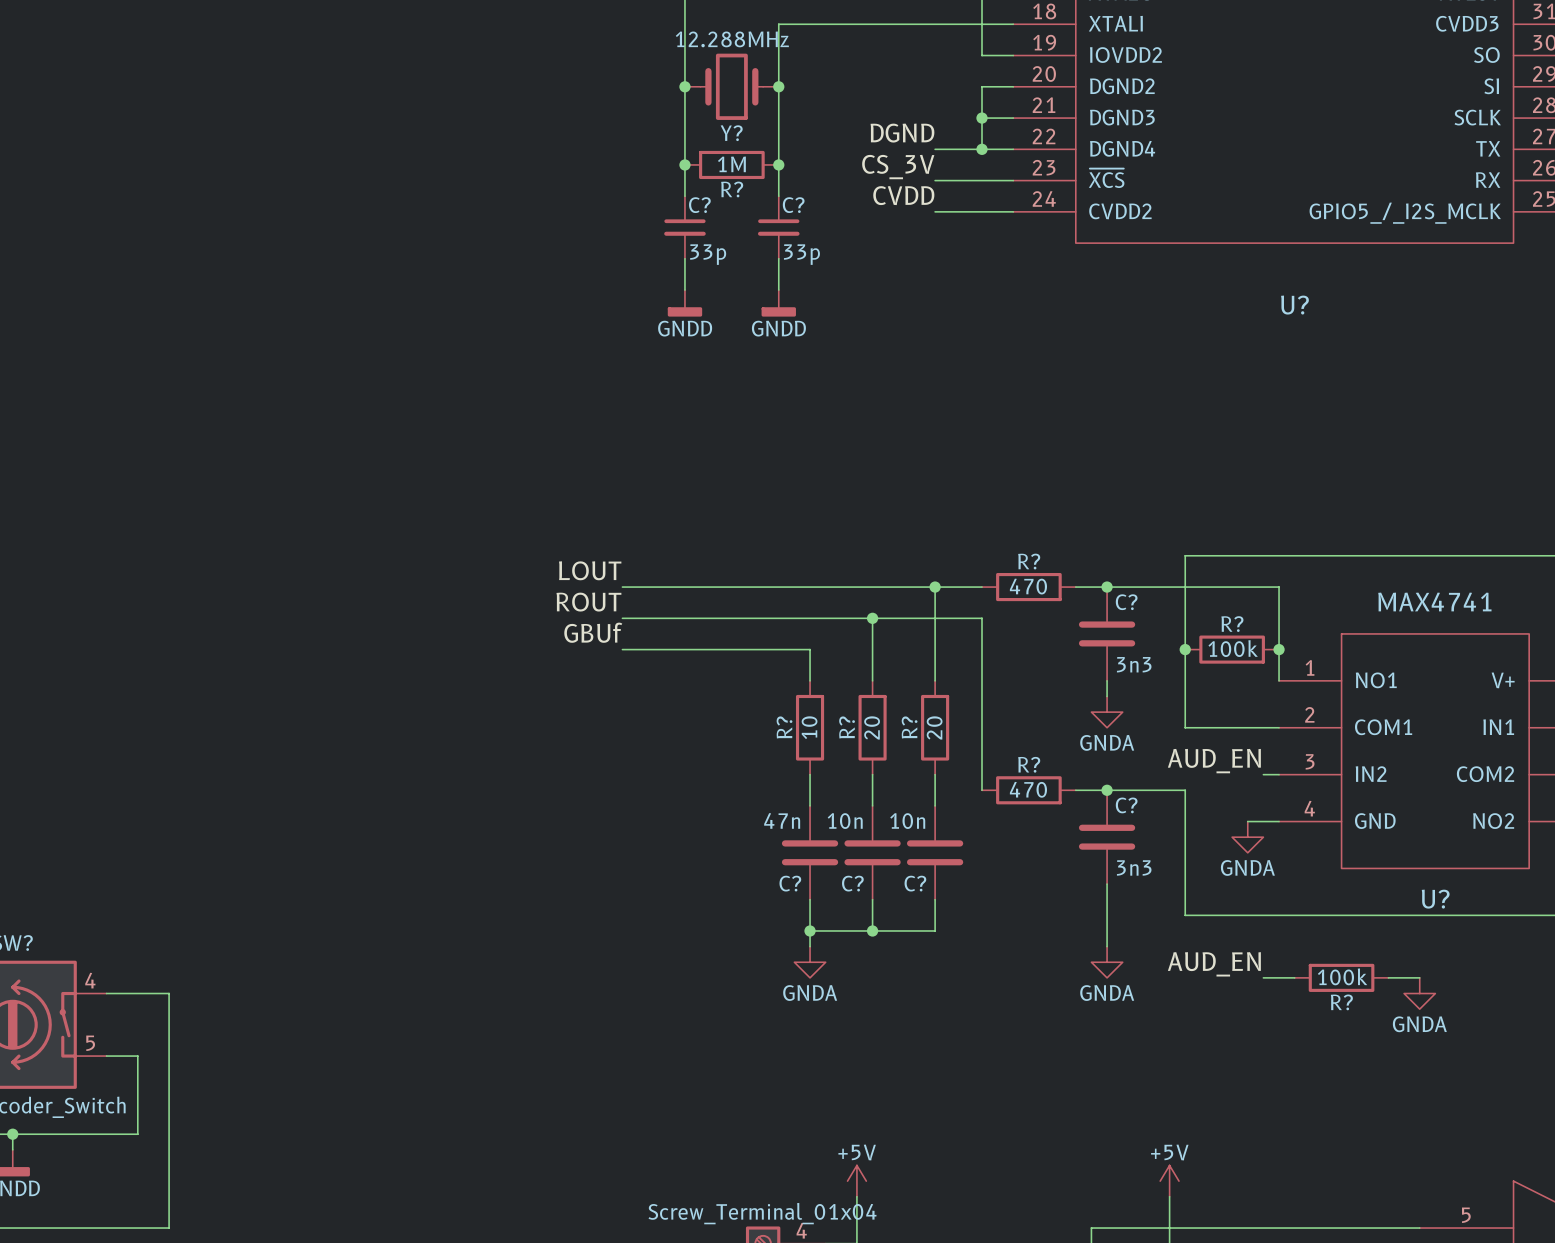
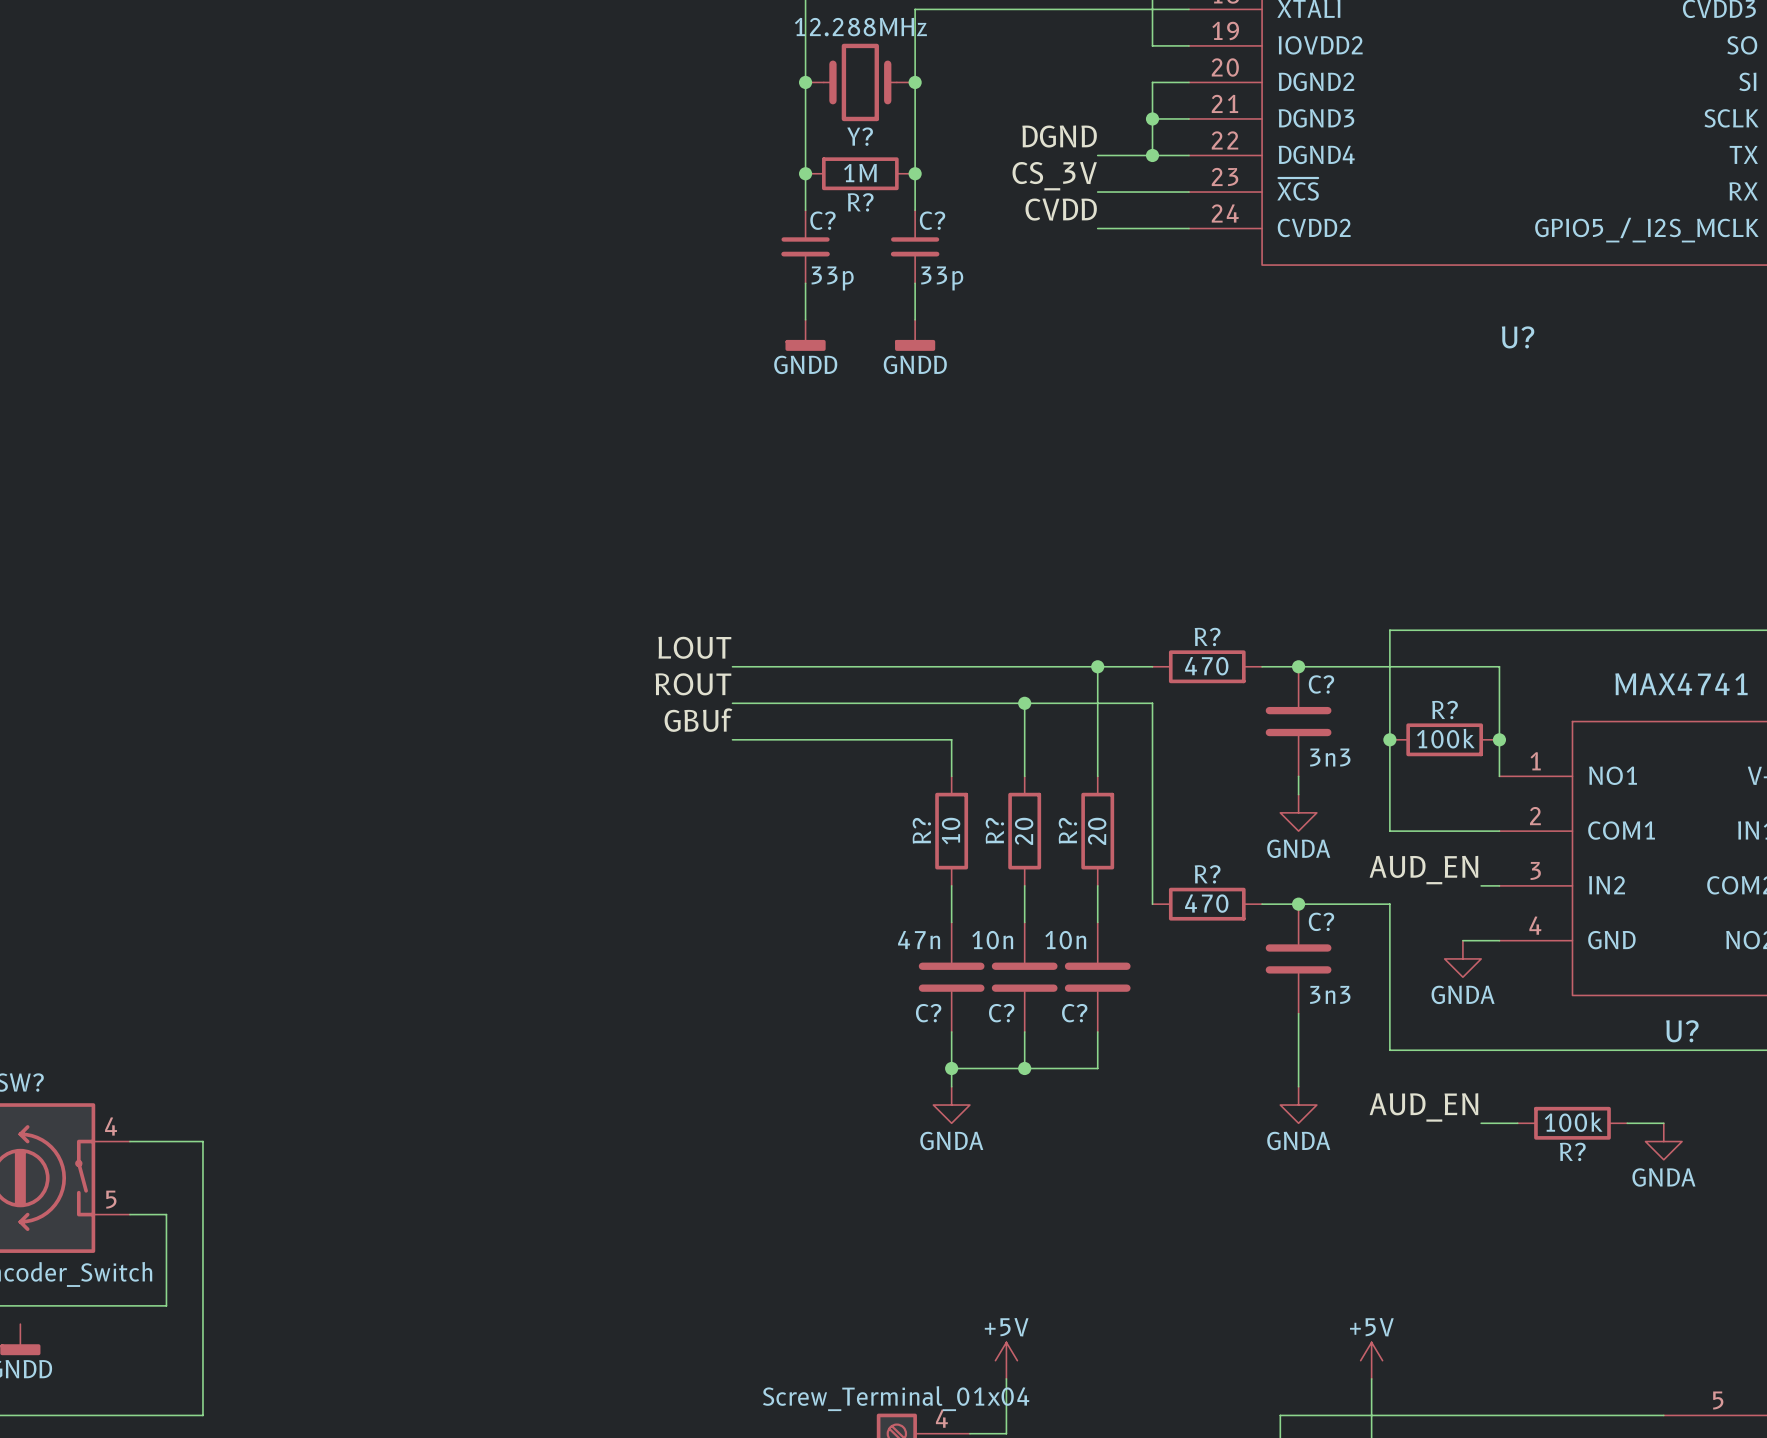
wire: (12, 1134) (12, 1149) -> none
junction: (12, 1134) -> none

